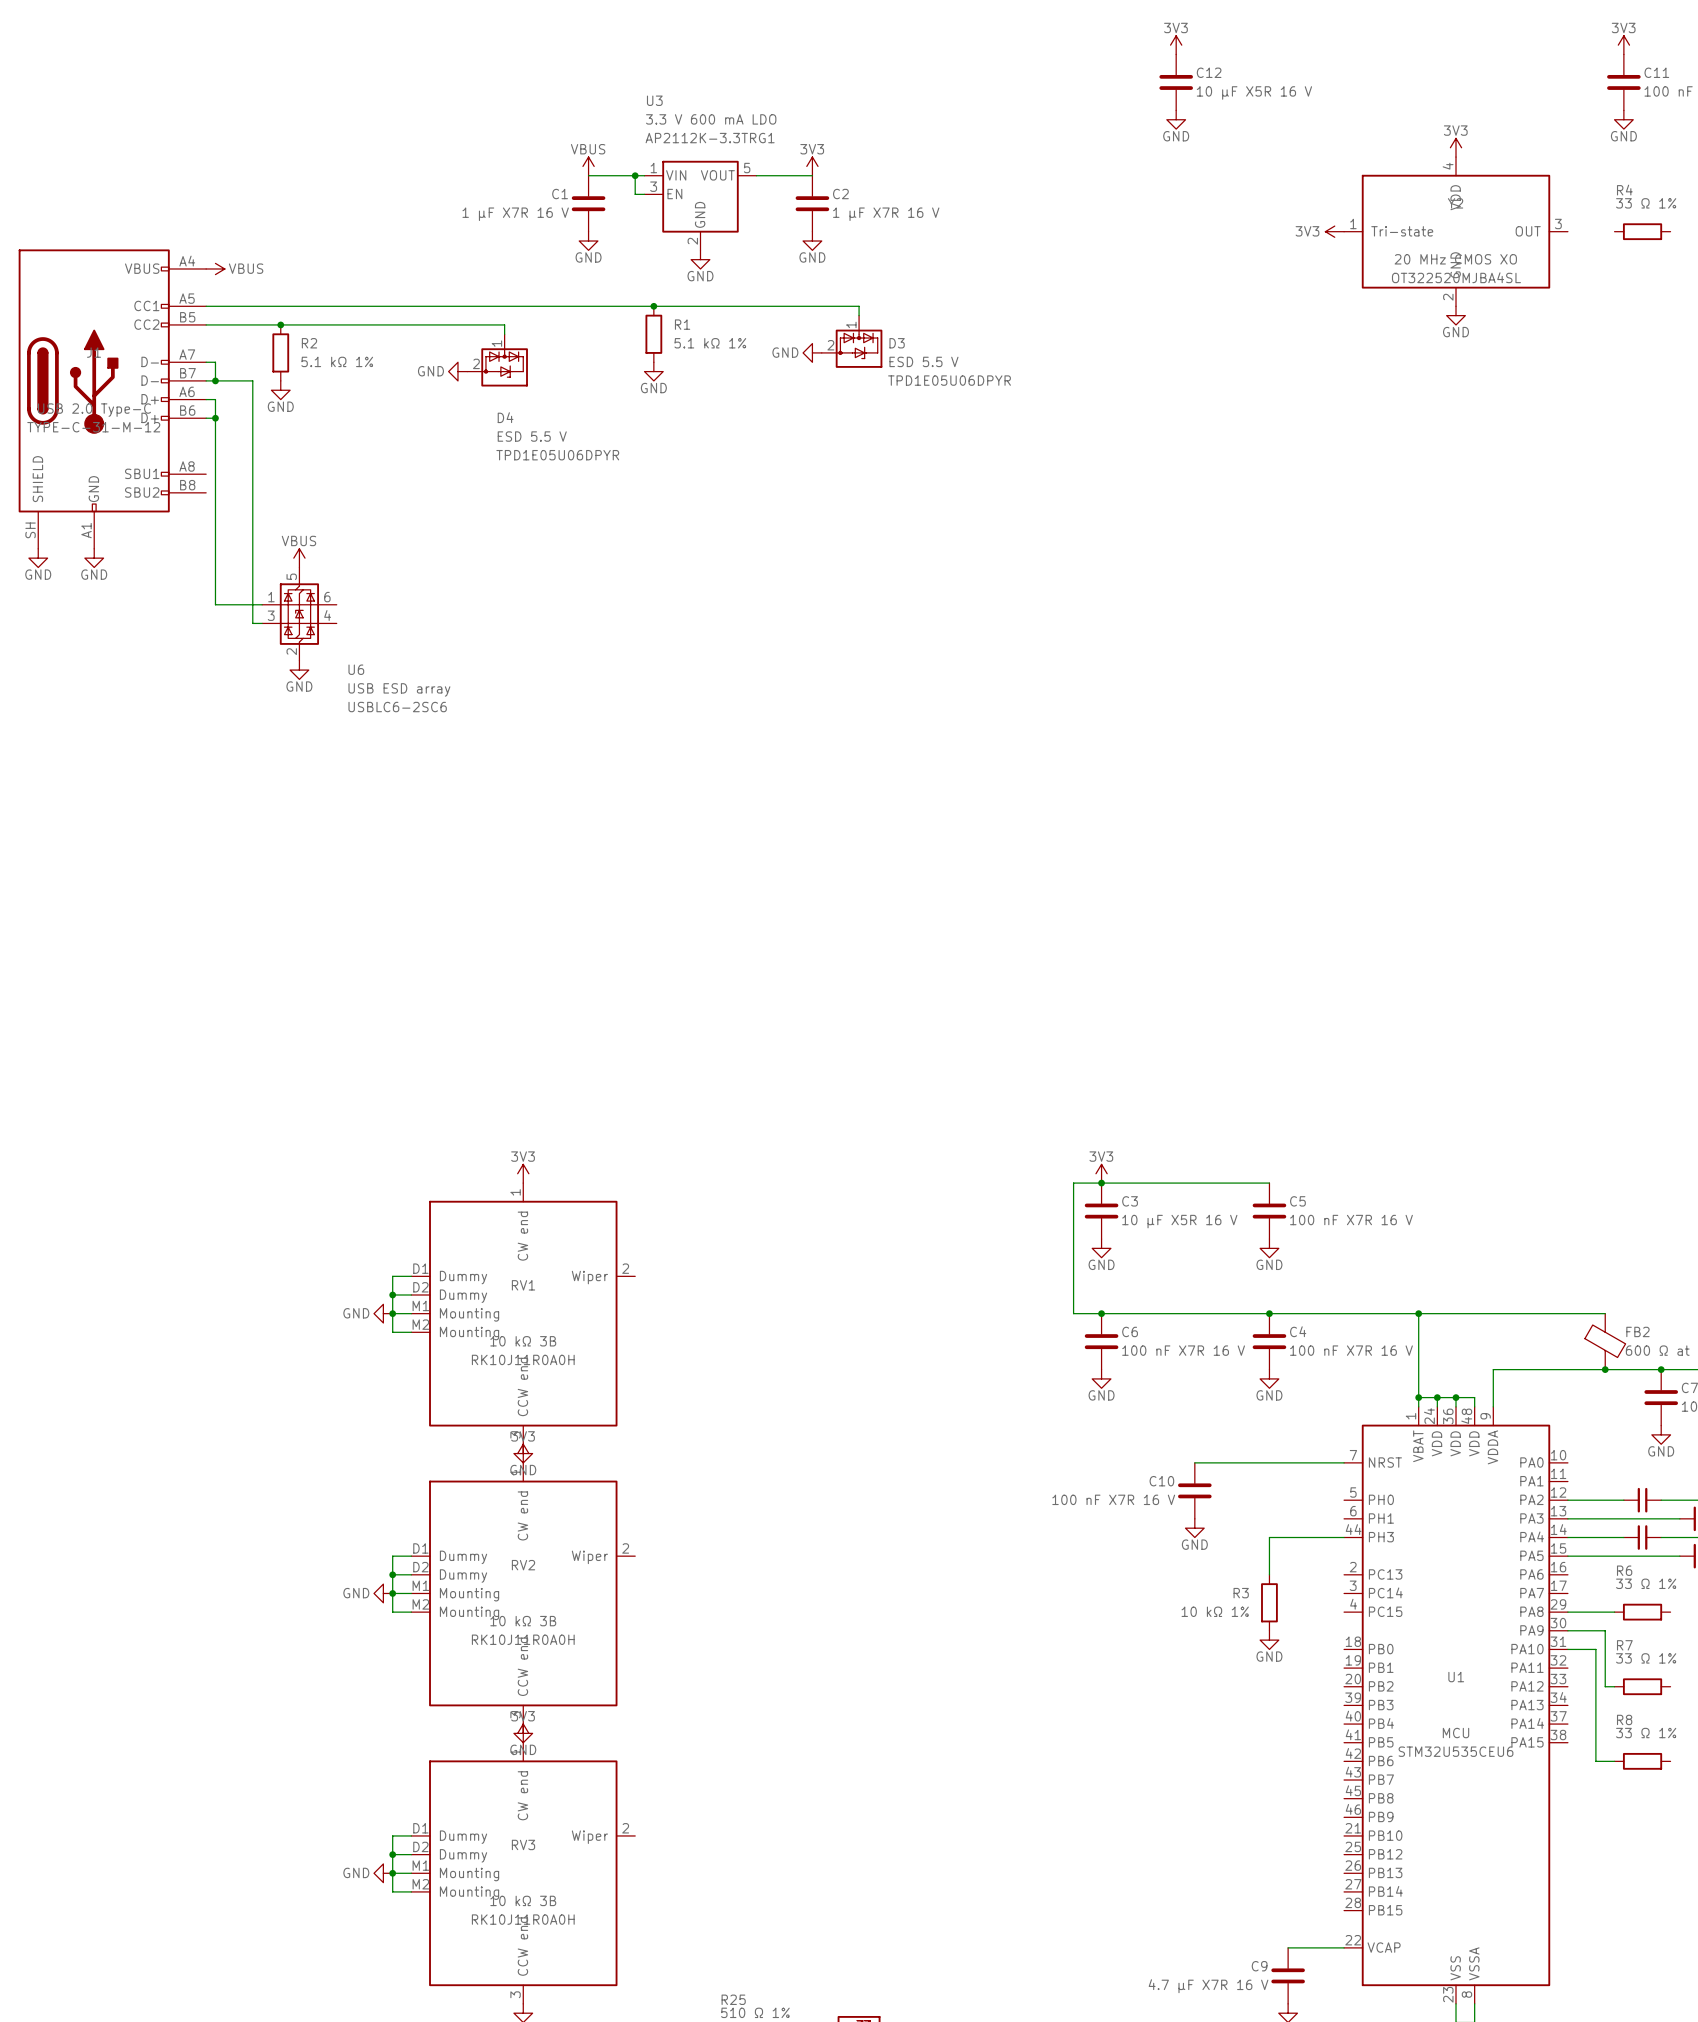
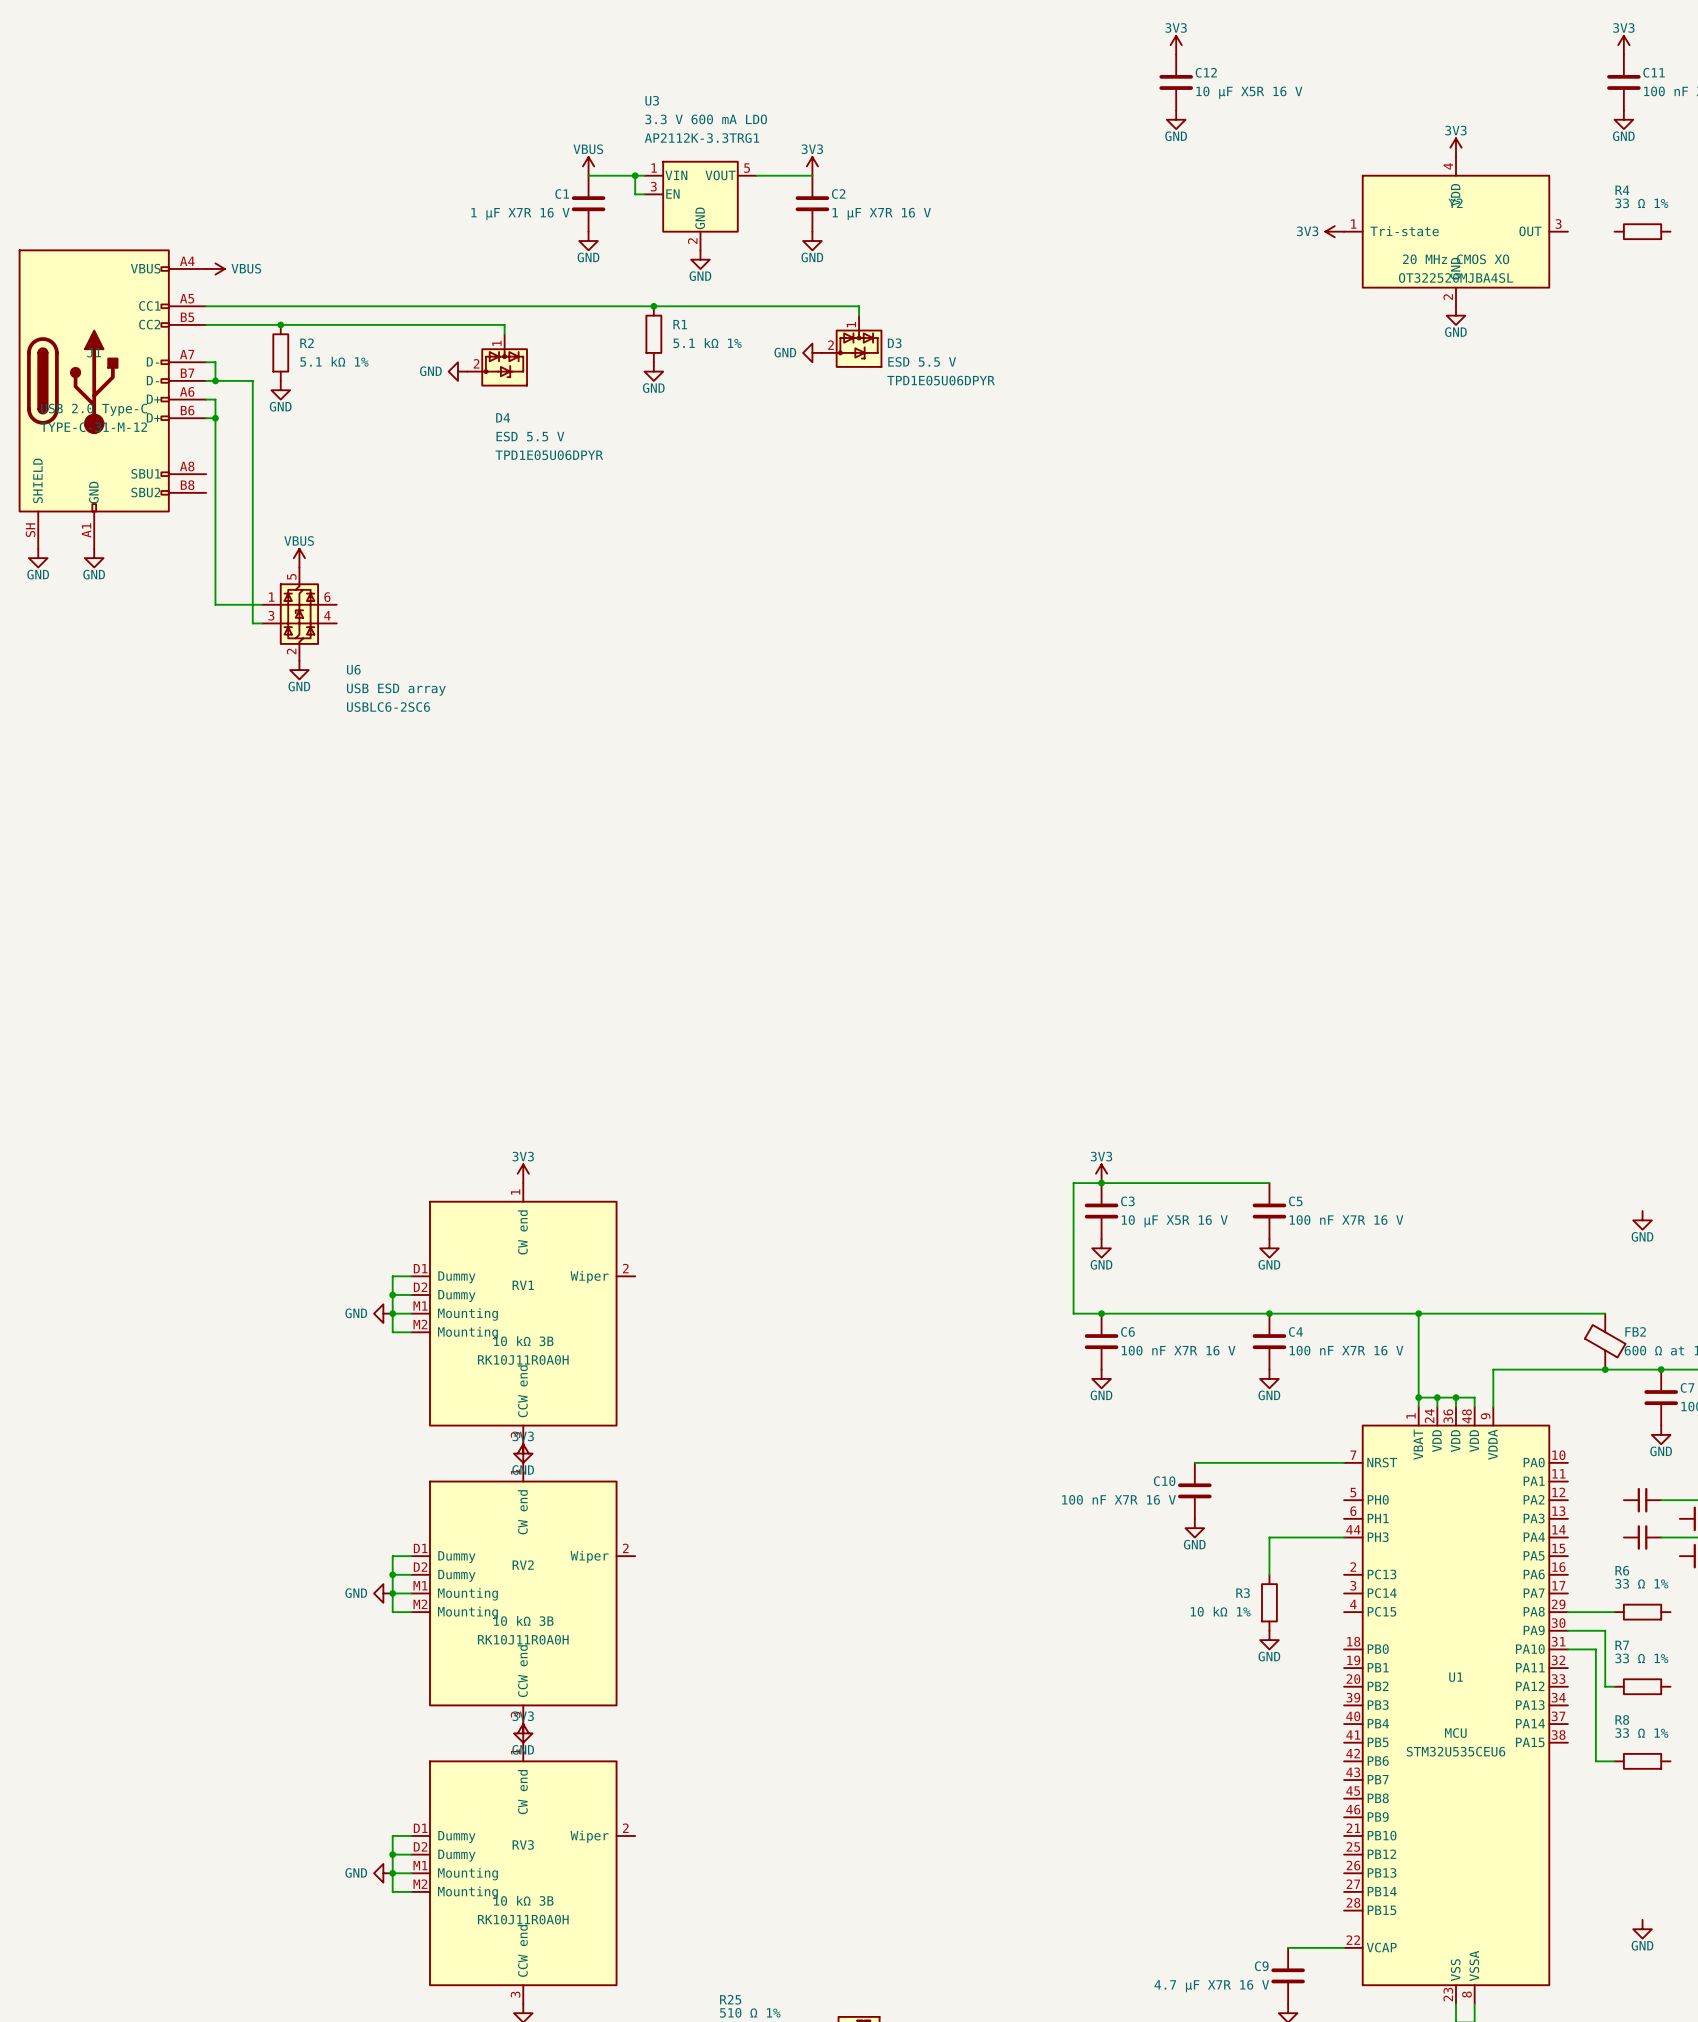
power symbol: none -> GND (1642, 1220)
wire: (1567, 1500) (1623, 1500) -> none
wire: (1567, 1518) (1679, 1518) -> none
wire: (1567, 1537) (1623, 1537) -> none
wire: (1567, 1556) (1679, 1556) -> none
power symbol: none -> GND (1642, 1929)

